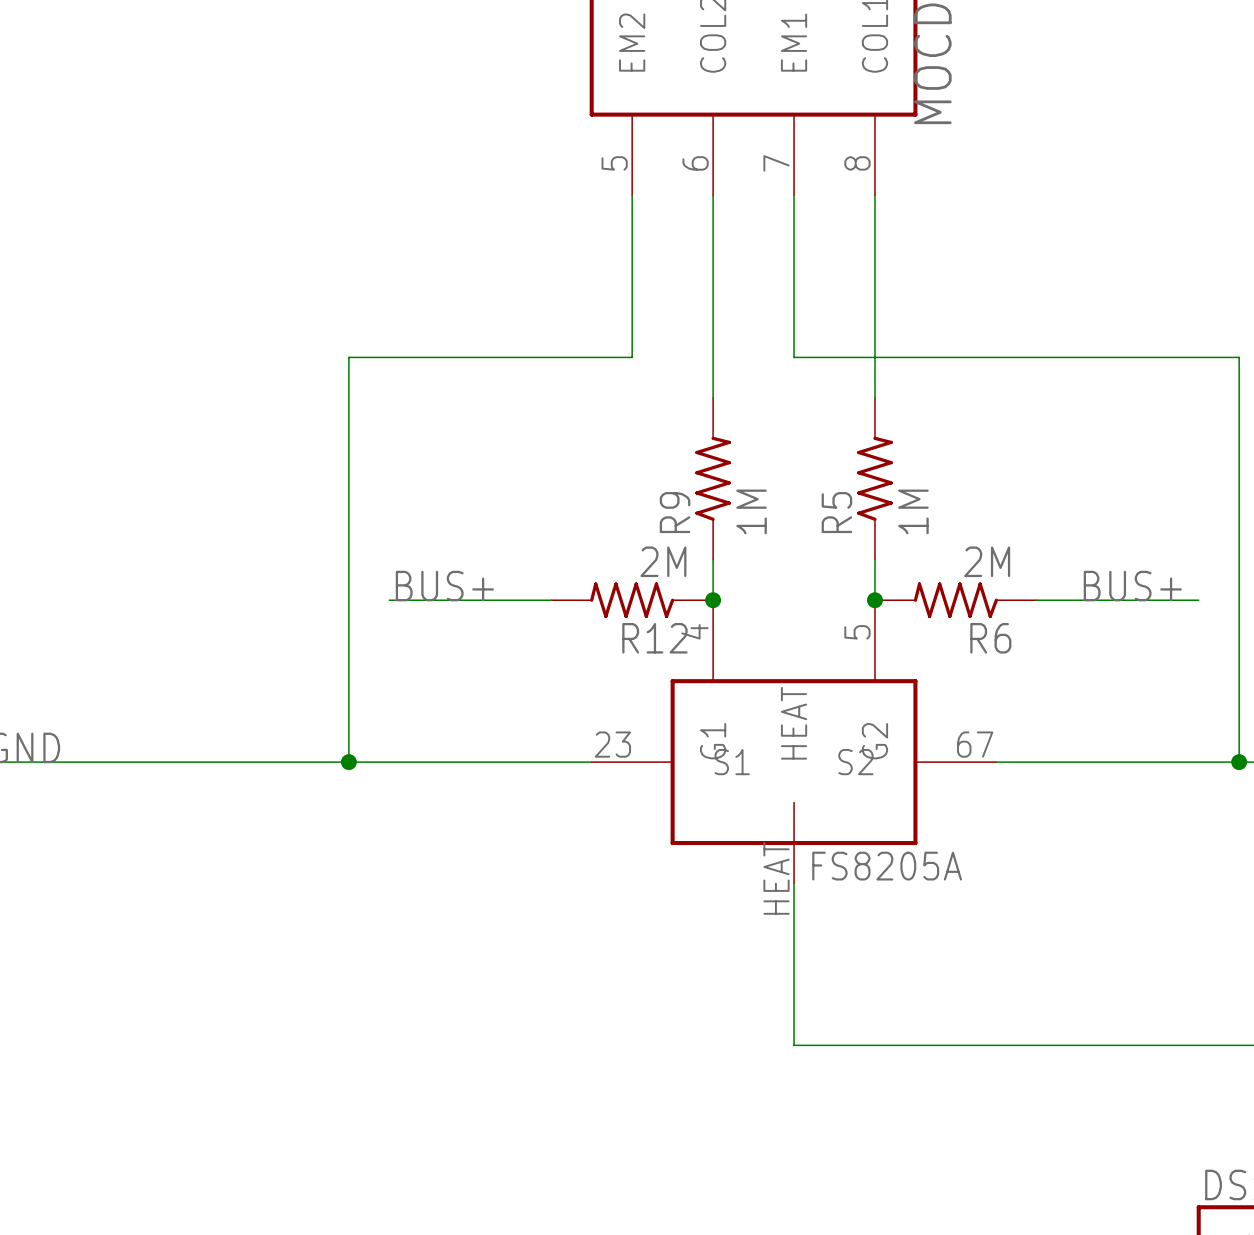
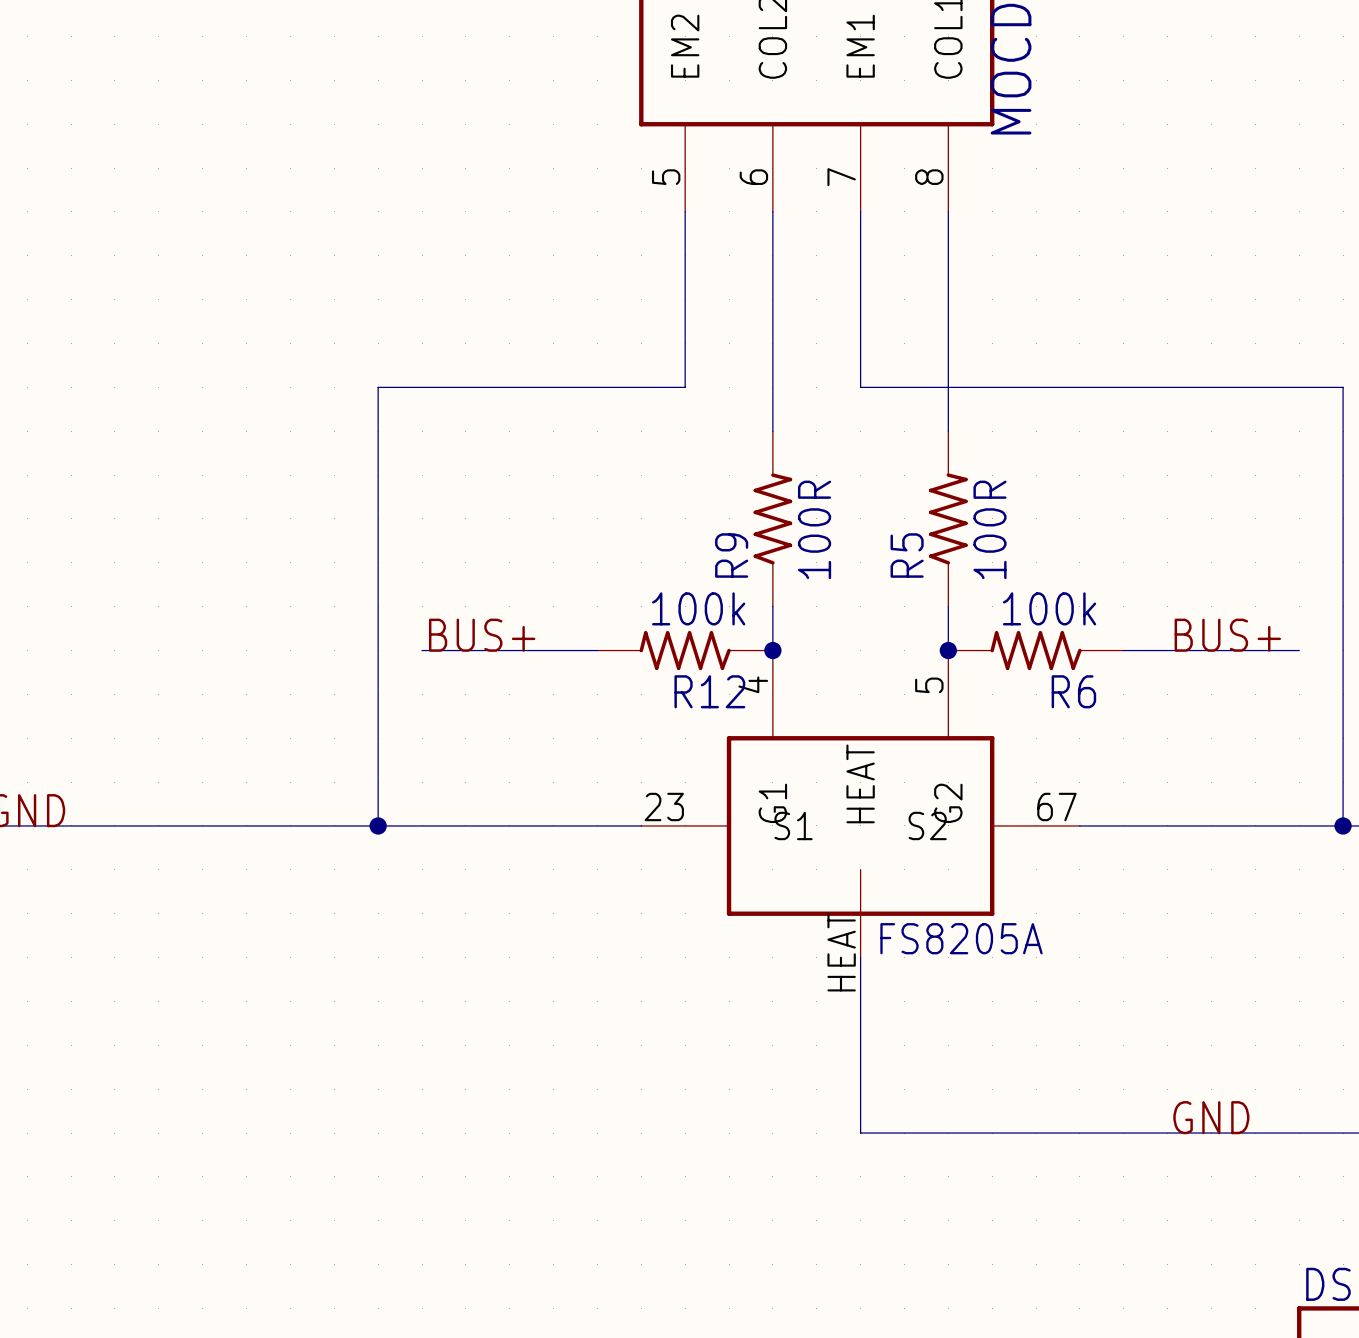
R9 value: 1M (751, 511) -> 100R (814, 529)
R5 value: 1M (913, 511) -> 100R (989, 529)
R12 value: 2M (663, 561) -> 100k (698, 608)
R6 value: 2M (987, 561) -> 100k (1049, 608)
label: none -> GND (1211, 1117)

